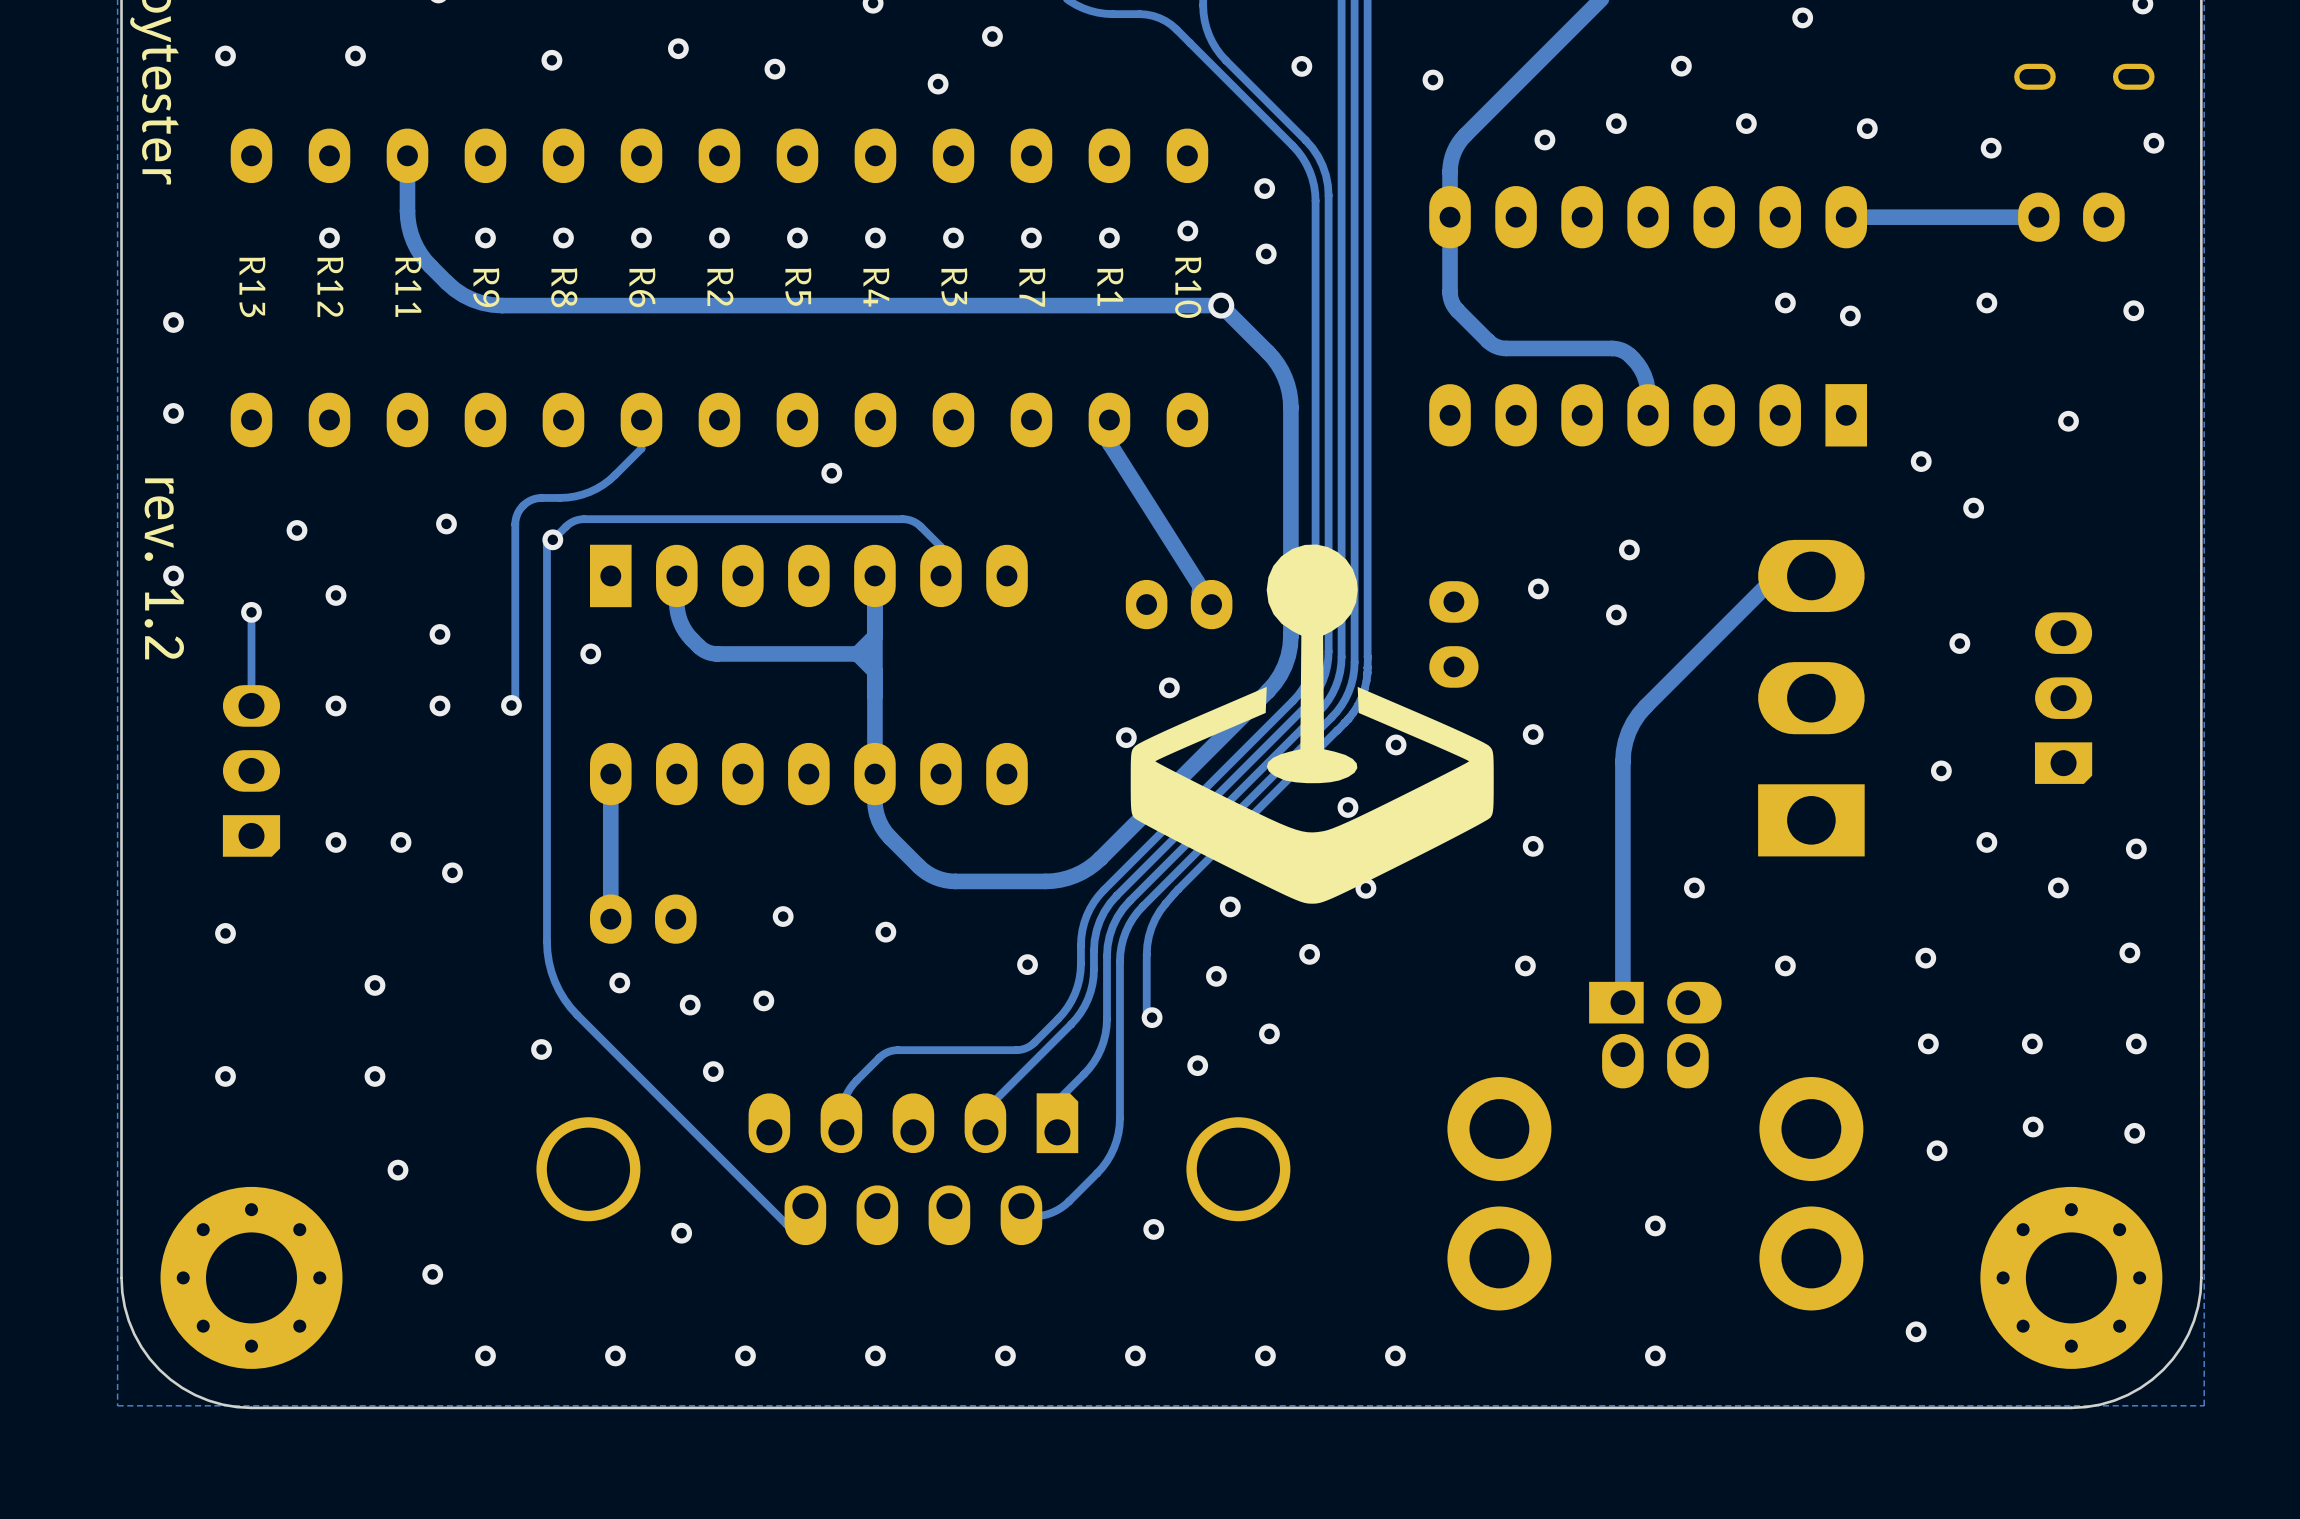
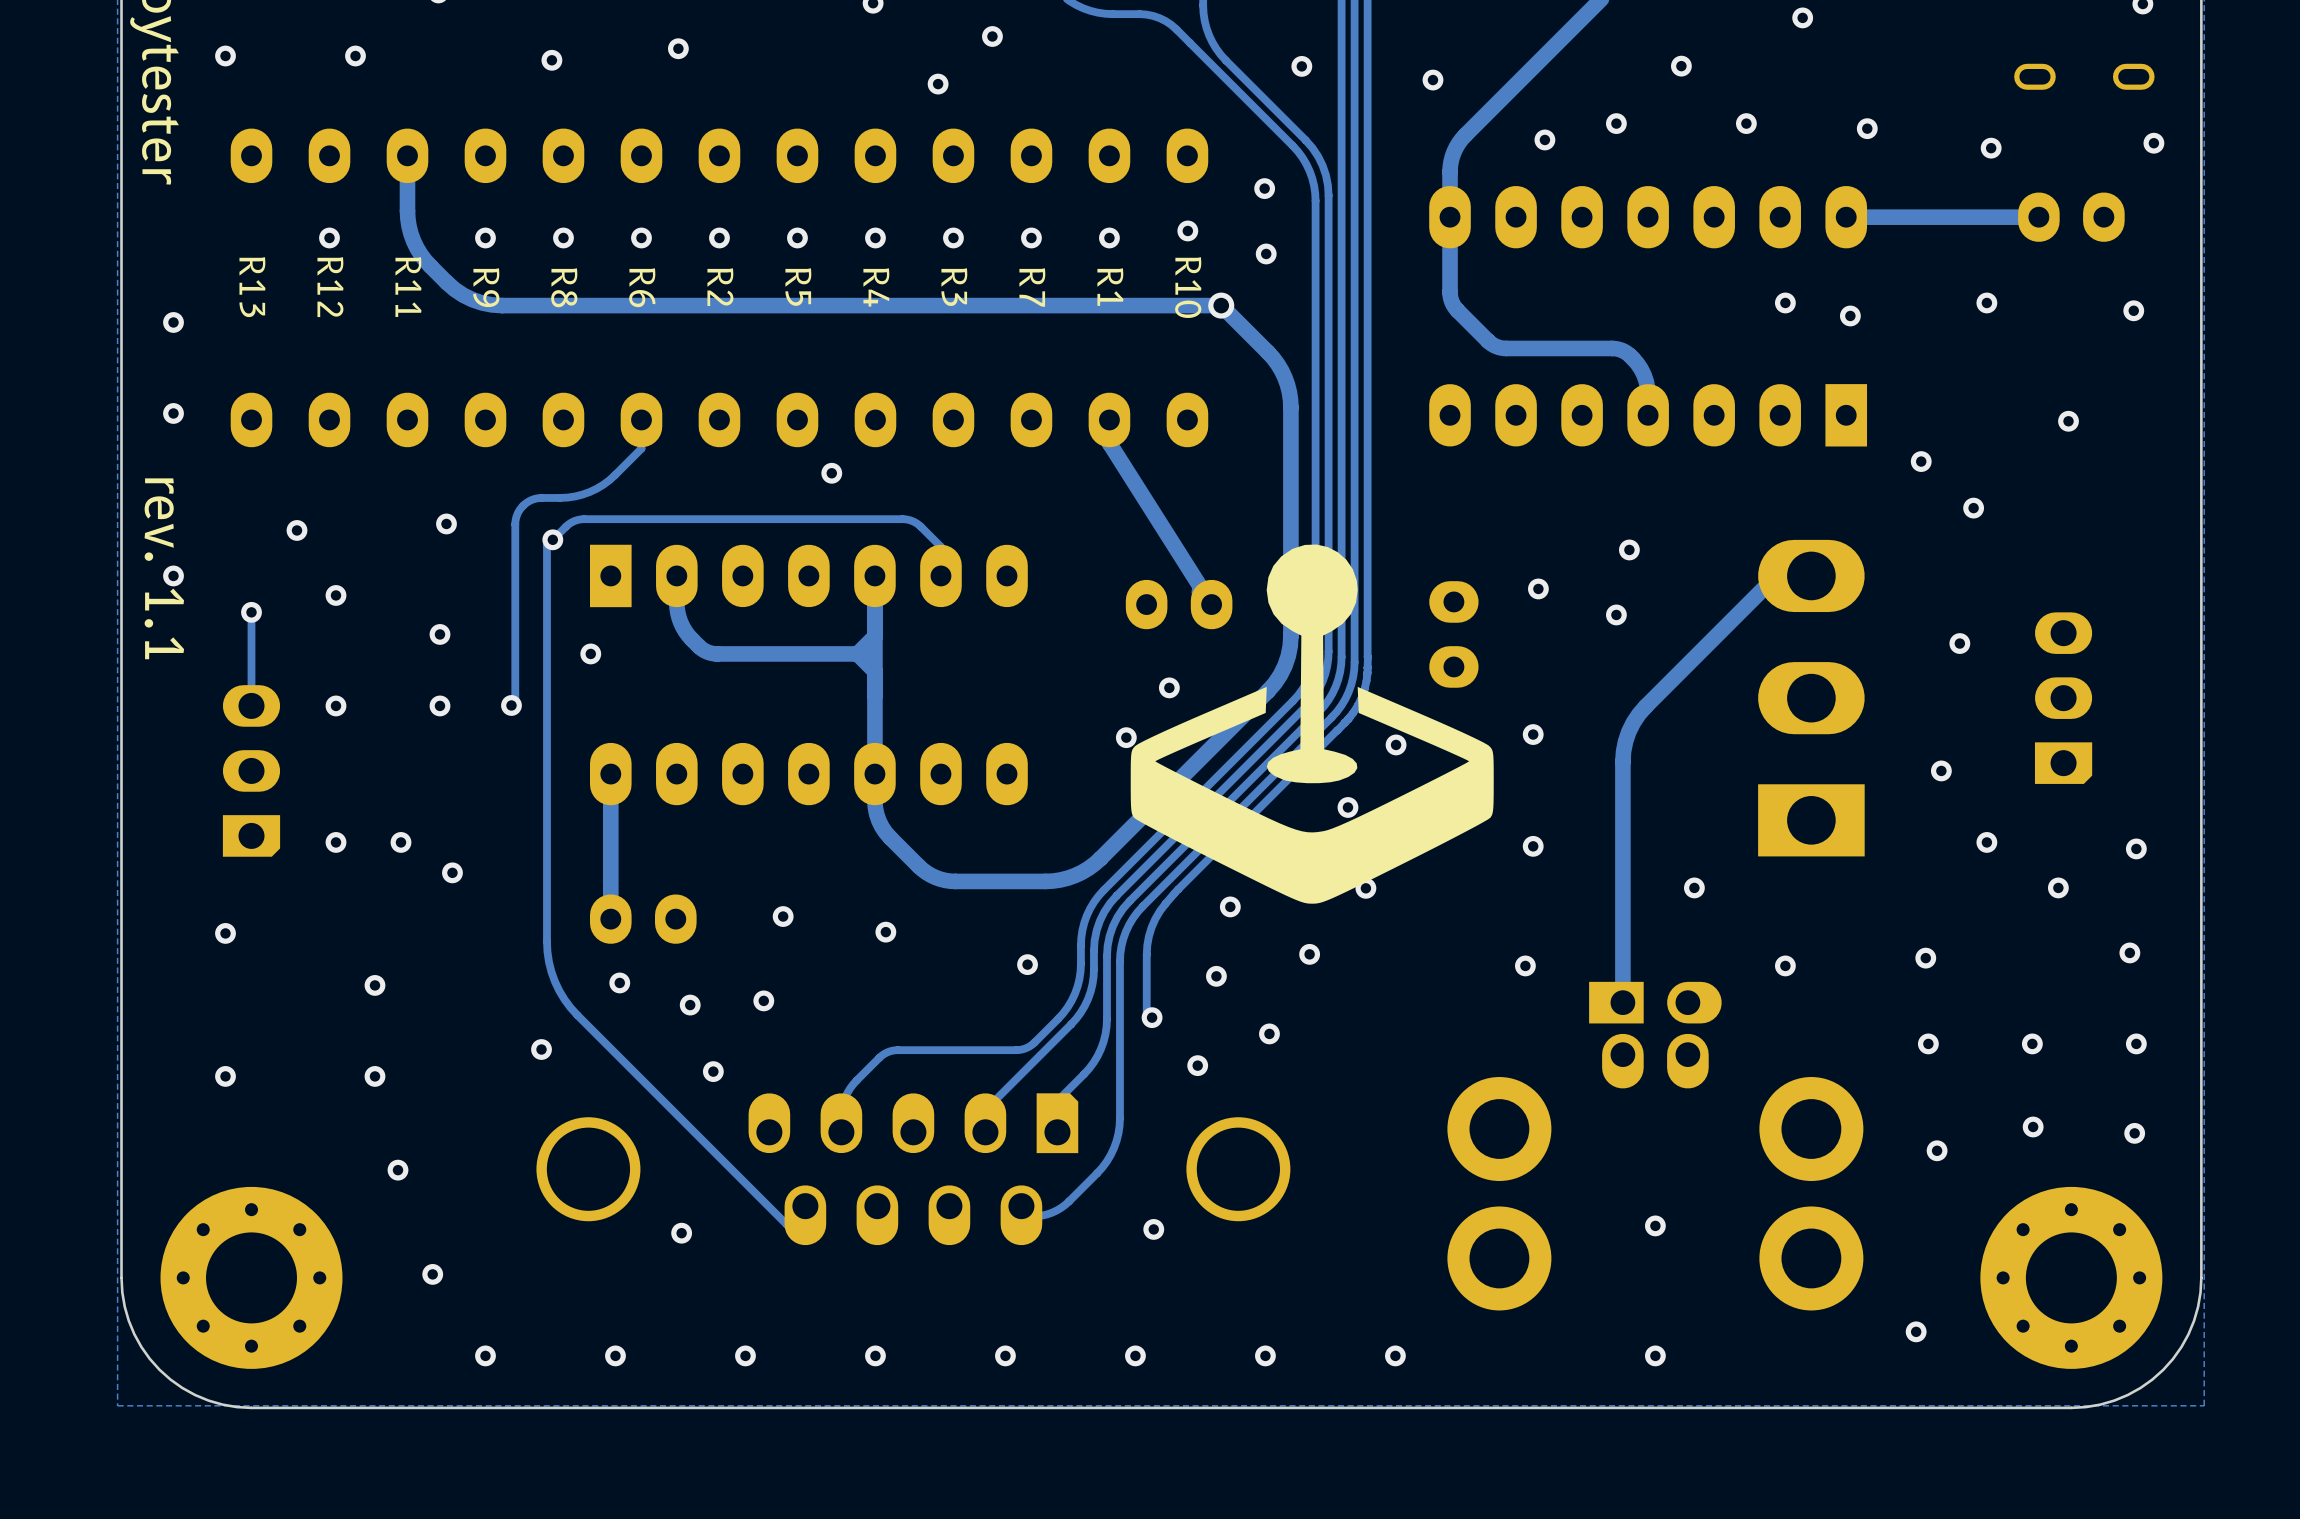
via: (774, 69) -> none
text: rev. 1.2 (164, 568) -> rev. 1.1 (164, 568)

